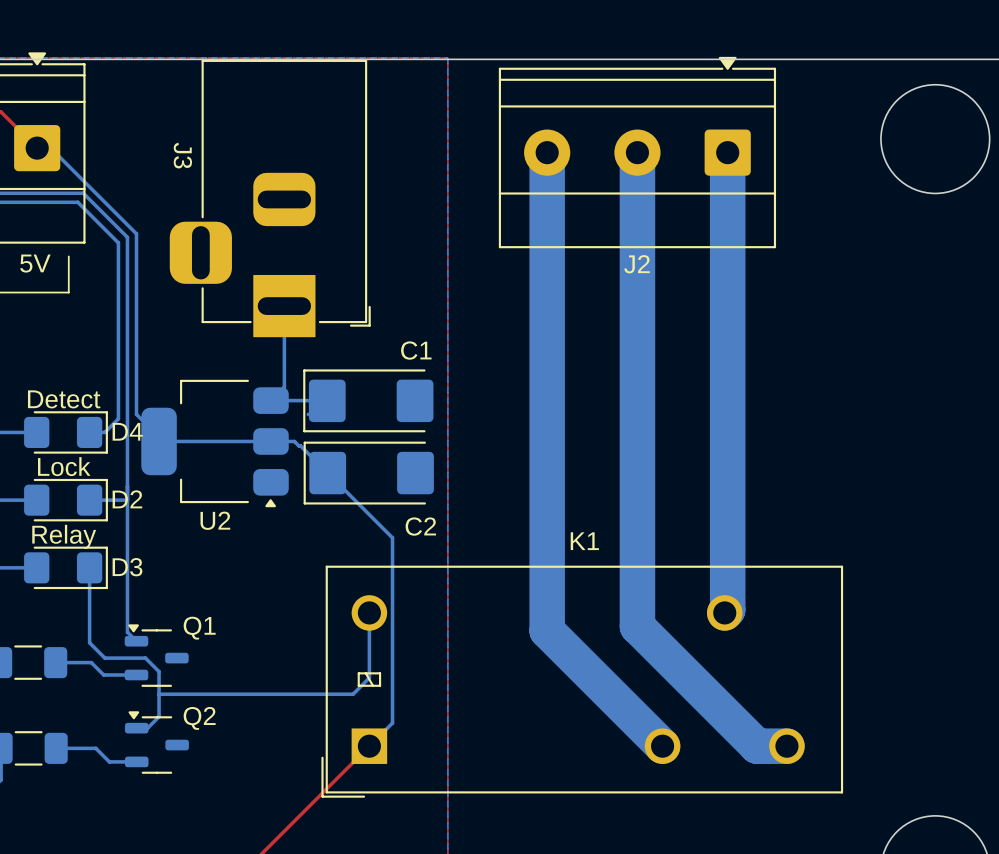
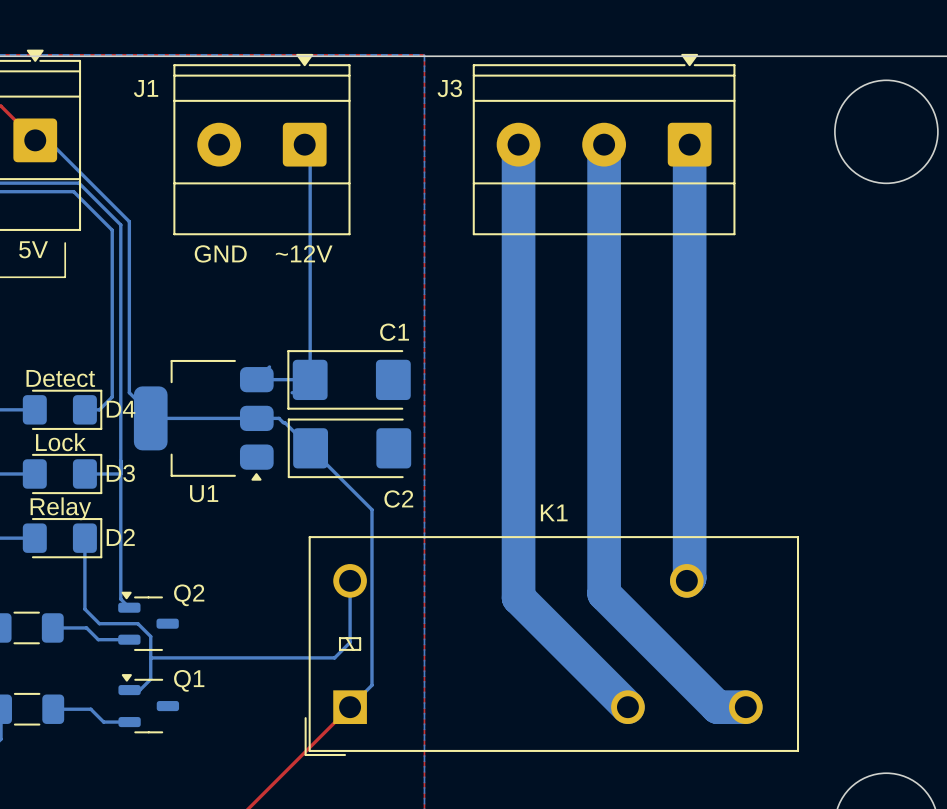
bottom track: none -> (304, 140) (310, 145) (310, 379)
J1: none -> (261, 144)
J3: (270, 198) -> none
J2 name: J2 (637, 264) -> J3 (449, 88)
text: none -> GND (220, 253)
text: none -> ~12V (304, 253)
bottom track: (284, 306) (284, 387) -> none
D2 name: D2 (127, 499) -> D3 (120, 473)
U2 name: U2 (215, 520) -> U1 (204, 493)
D3 name: D3 (127, 567) -> D2 (120, 537)
Q1 name: Q1 (199, 628) -> Q2 (189, 595)
Q2 name: Q2 (199, 718) -> Q1 (189, 680)

